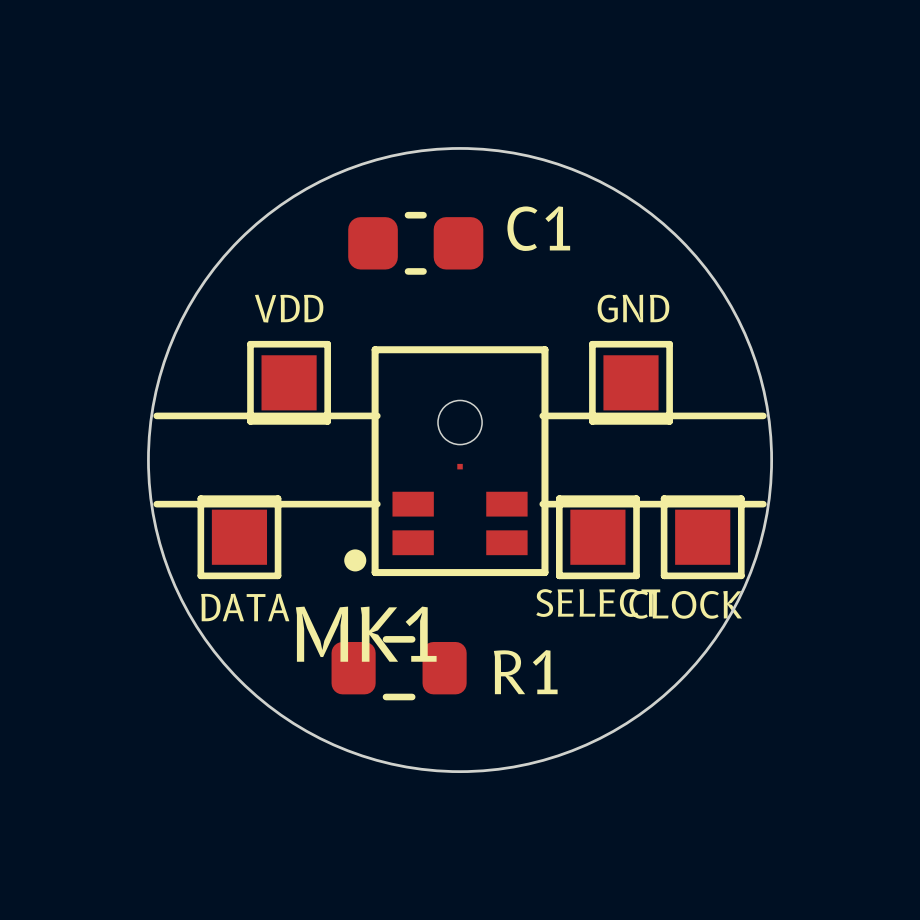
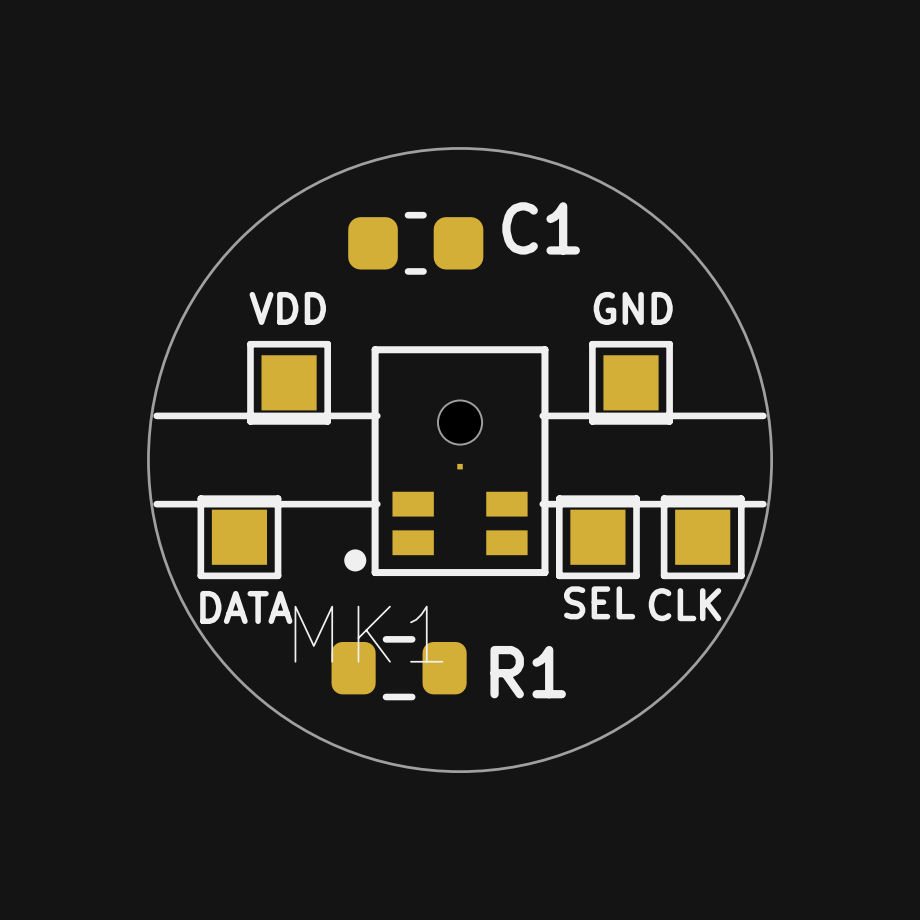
part value: SELECT (598, 603) -> SEL (599, 602)
part value: CLOCK (685, 604) -> CLK (684, 604)

